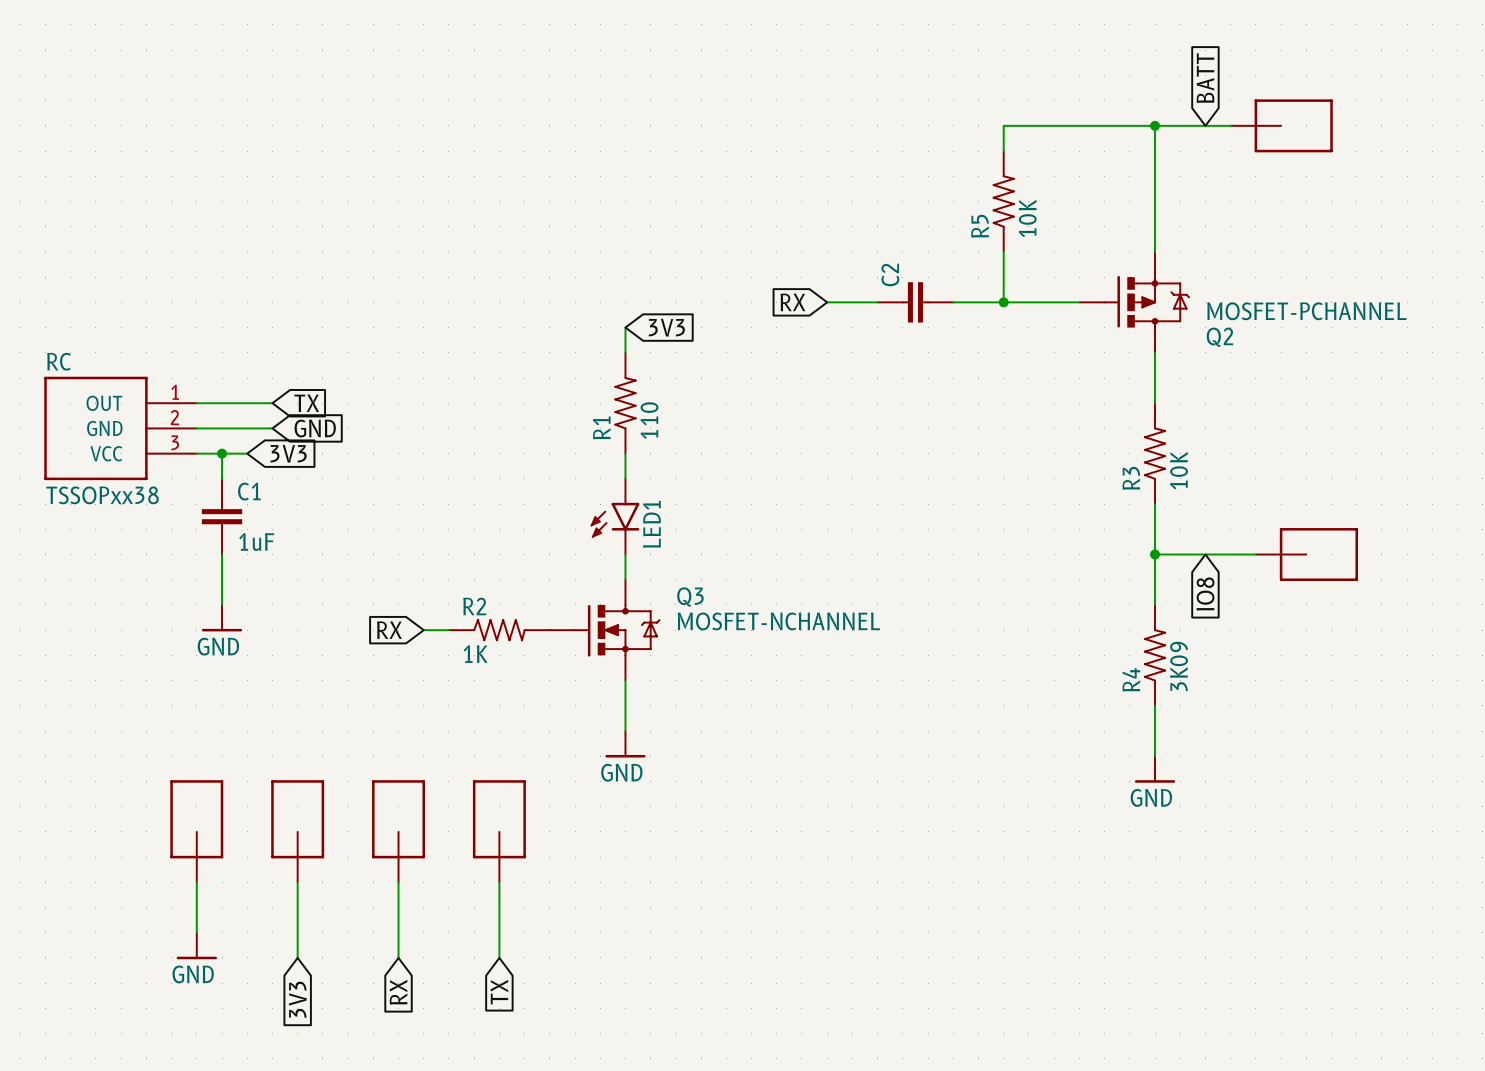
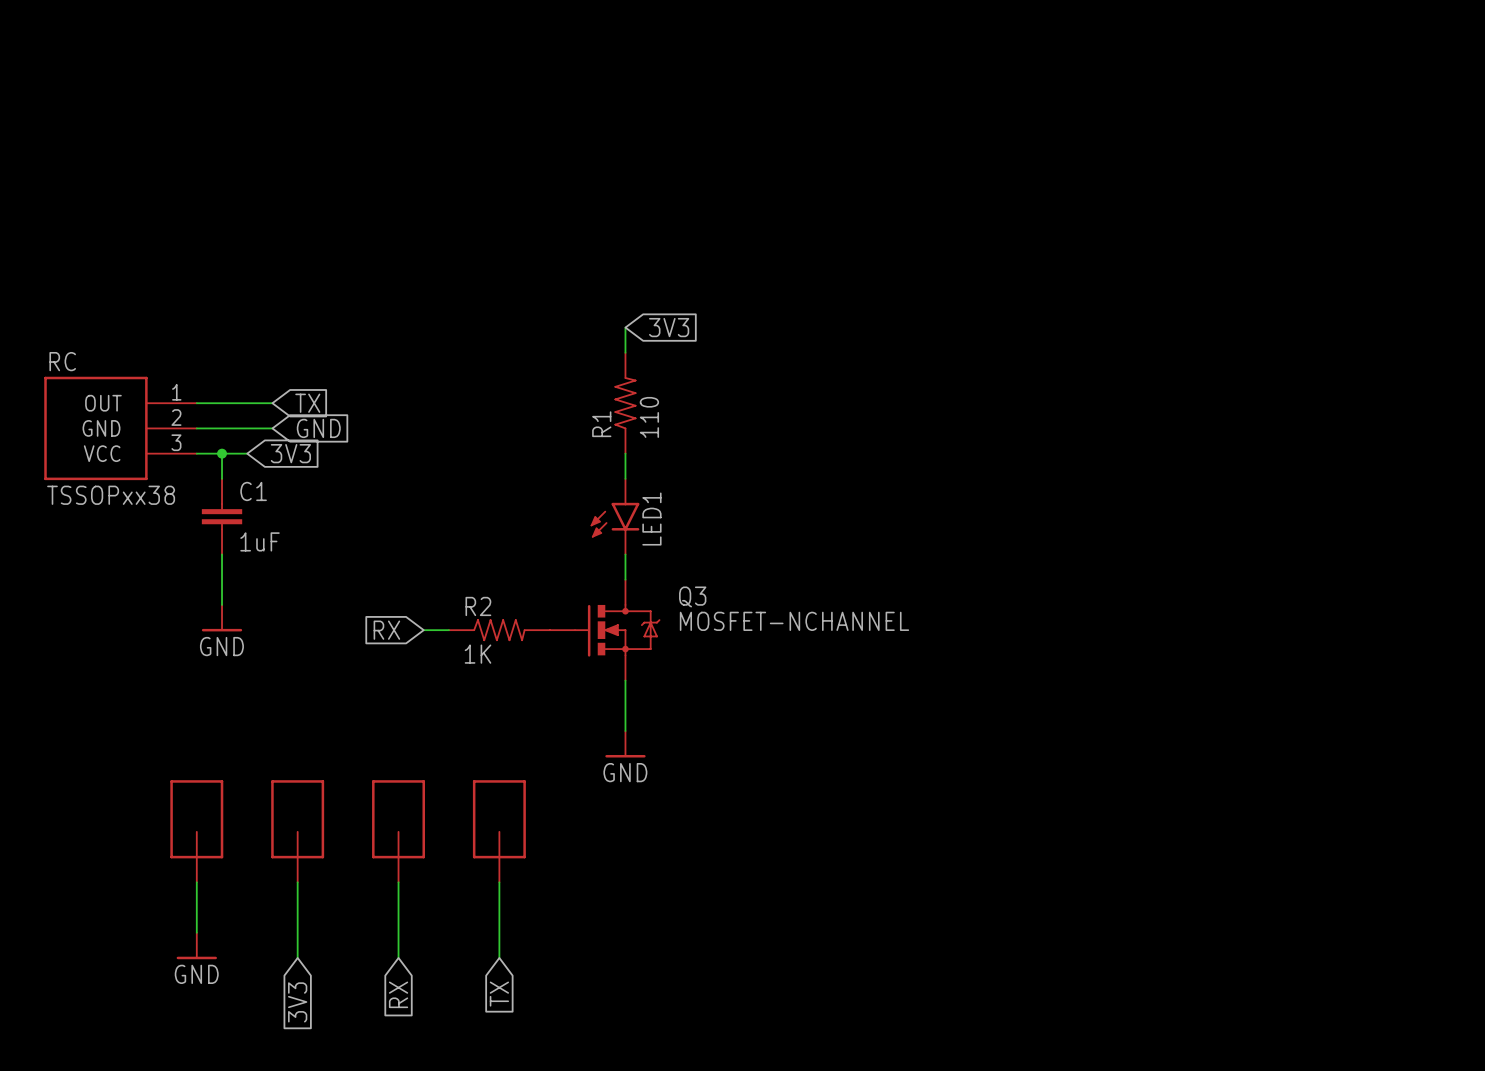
global label: BATT (1205, 78) -> none
wire: (1155, 125) (1155, 251) -> none
junction: (1155, 125) -> none
wire: (1230, 125) (1003, 125) (1003, 151) -> none
part: (1281, 125) -> none
R5: 10K (1003, 201) -> none
wire: (1003, 251) (1003, 302) -> none
global label: RX (792, 302) -> none
wire: (827, 302) (877, 302) -> none
C2: (915, 302) -> none
wire: (953, 302) (1079, 302) -> none
junction: (1003, 302) -> none
Q2: MOSFET-PCHANNEL (1134, 302) -> none
wire: (1155, 352) (1155, 403) -> none
R3: 10K (1155, 453) -> none
wire: (1155, 504) (1155, 604) -> none
wire: (1155, 554) (1255, 554) -> none
junction: (1155, 554) -> none
part: (1306, 554) -> none
global label: IO8 (1205, 594) -> none
R4: 3K09 (1155, 655) -> none
wire: (1155, 705) (1155, 756) -> none
power symbol: GND (1155, 769) -> none

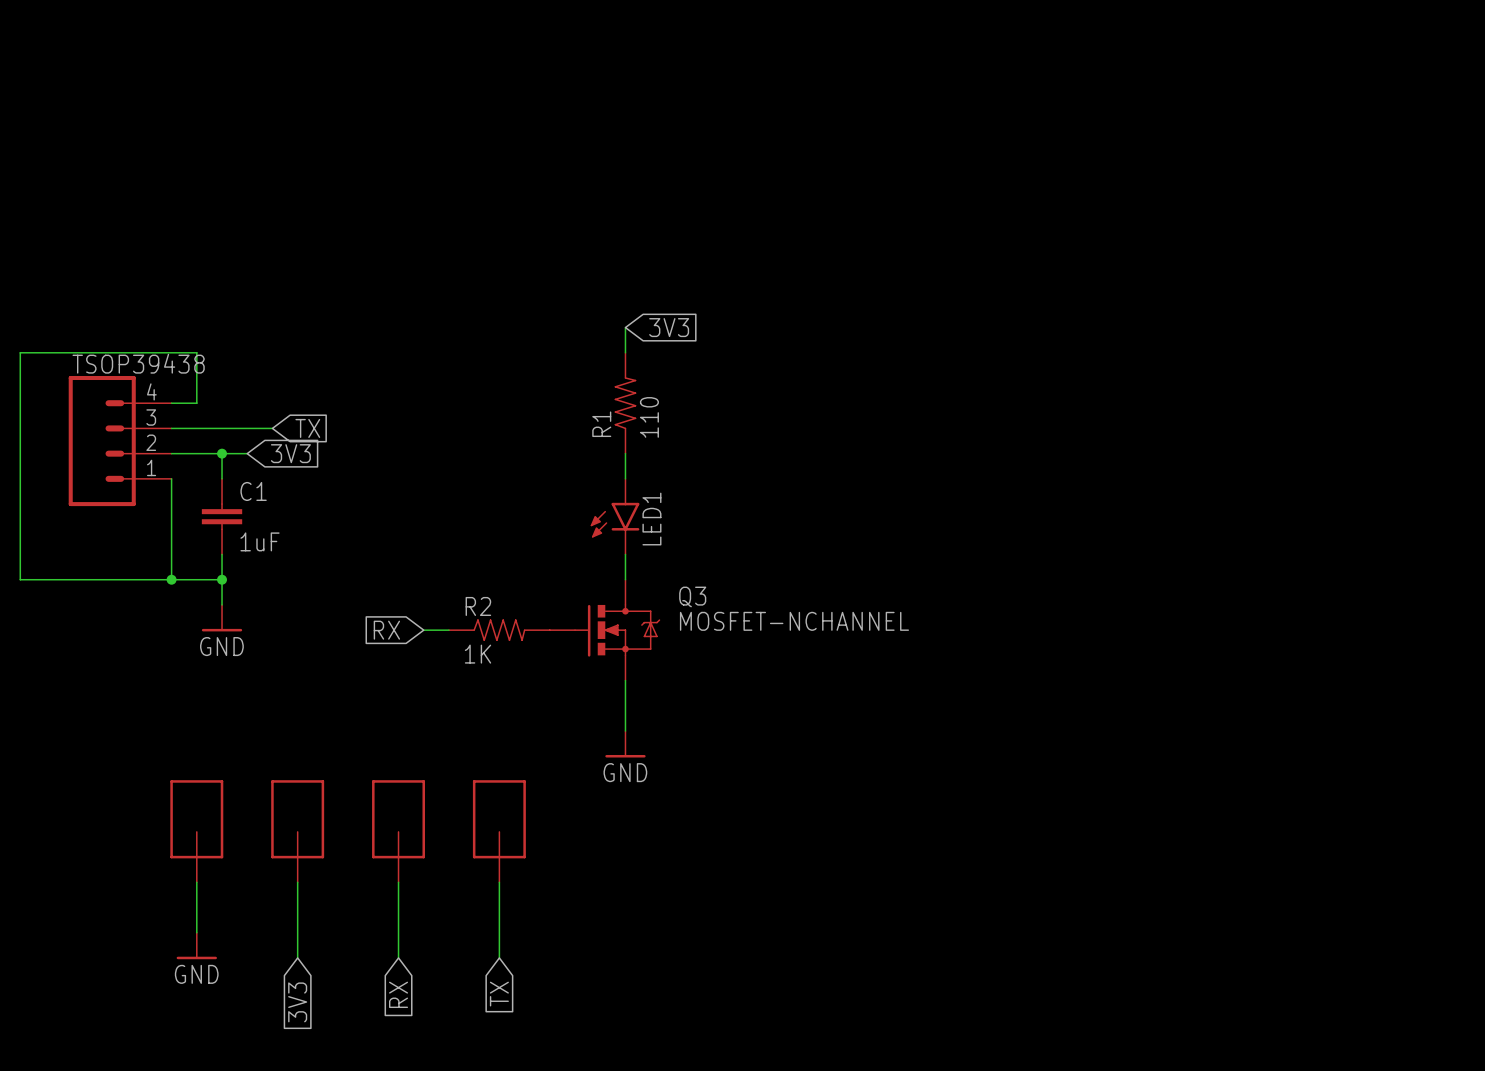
wire: none -> (171, 403) (196, 403) (196, 352) (20, 352) (20, 579) (222, 579)
wire: (196, 403) (272, 403) -> none
global label: TX (307, 403) -> none
RC: TSSOPxx38 (120, 428) -> none
global label: GND (318, 428) -> TX (307, 428)
TSOP39438: none -> (120, 441)
wire: none -> (171, 478) (171, 579)
junction: none -> (171, 579)
junction: none -> (222, 579)

